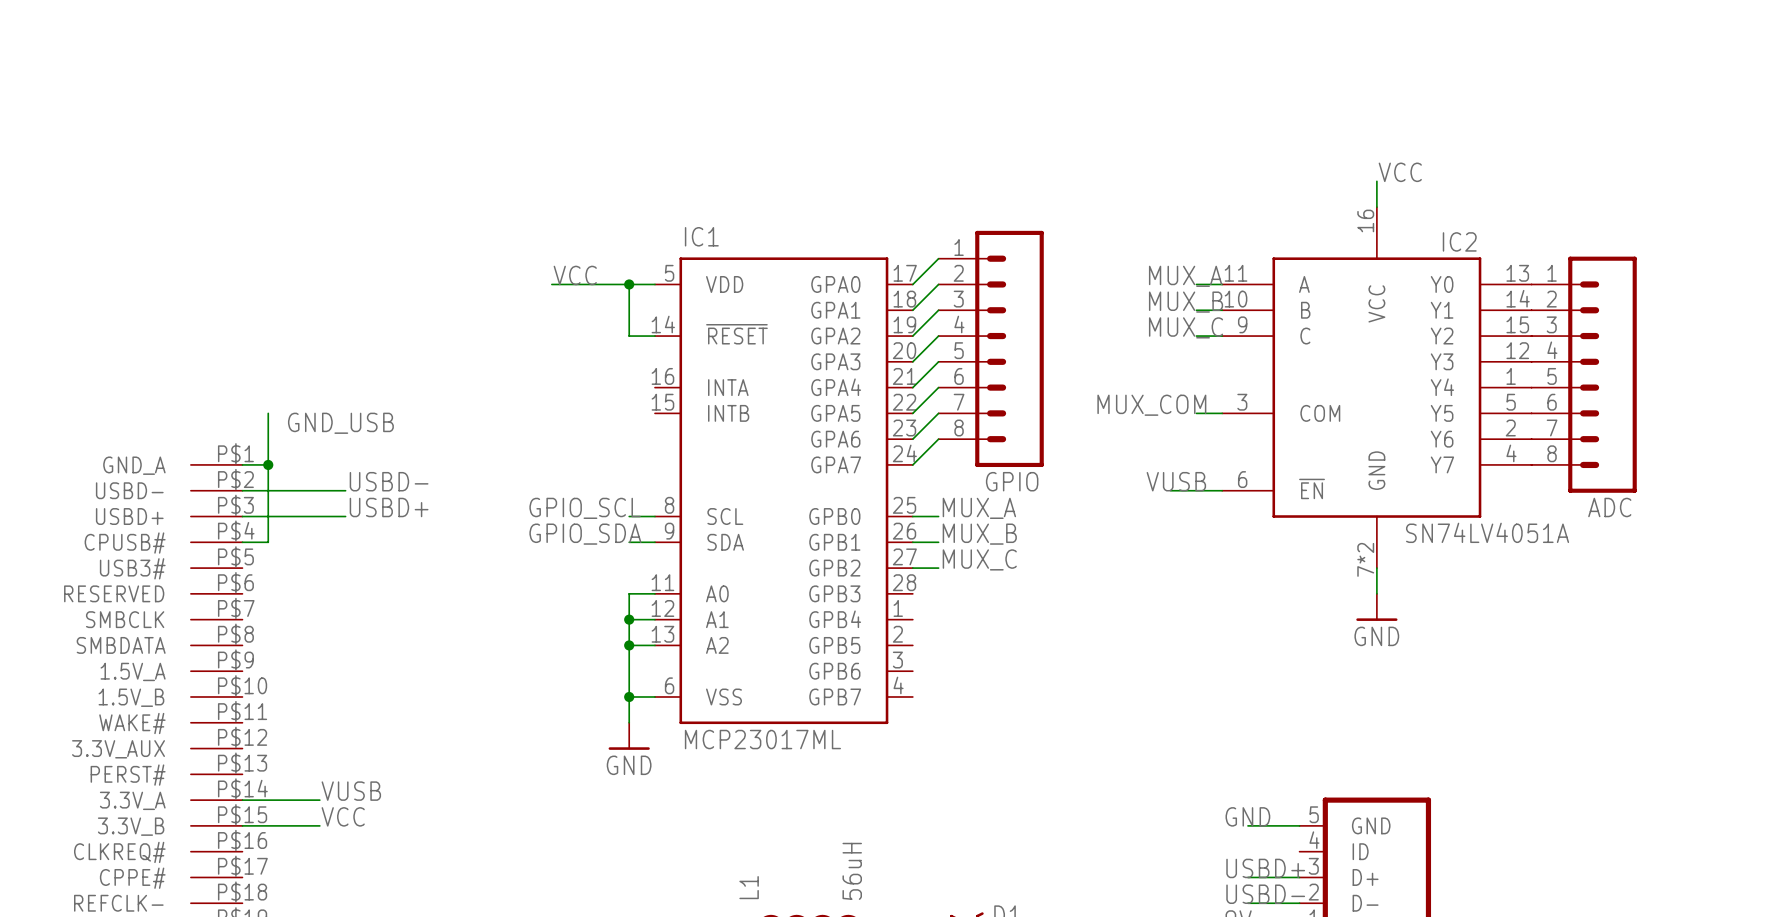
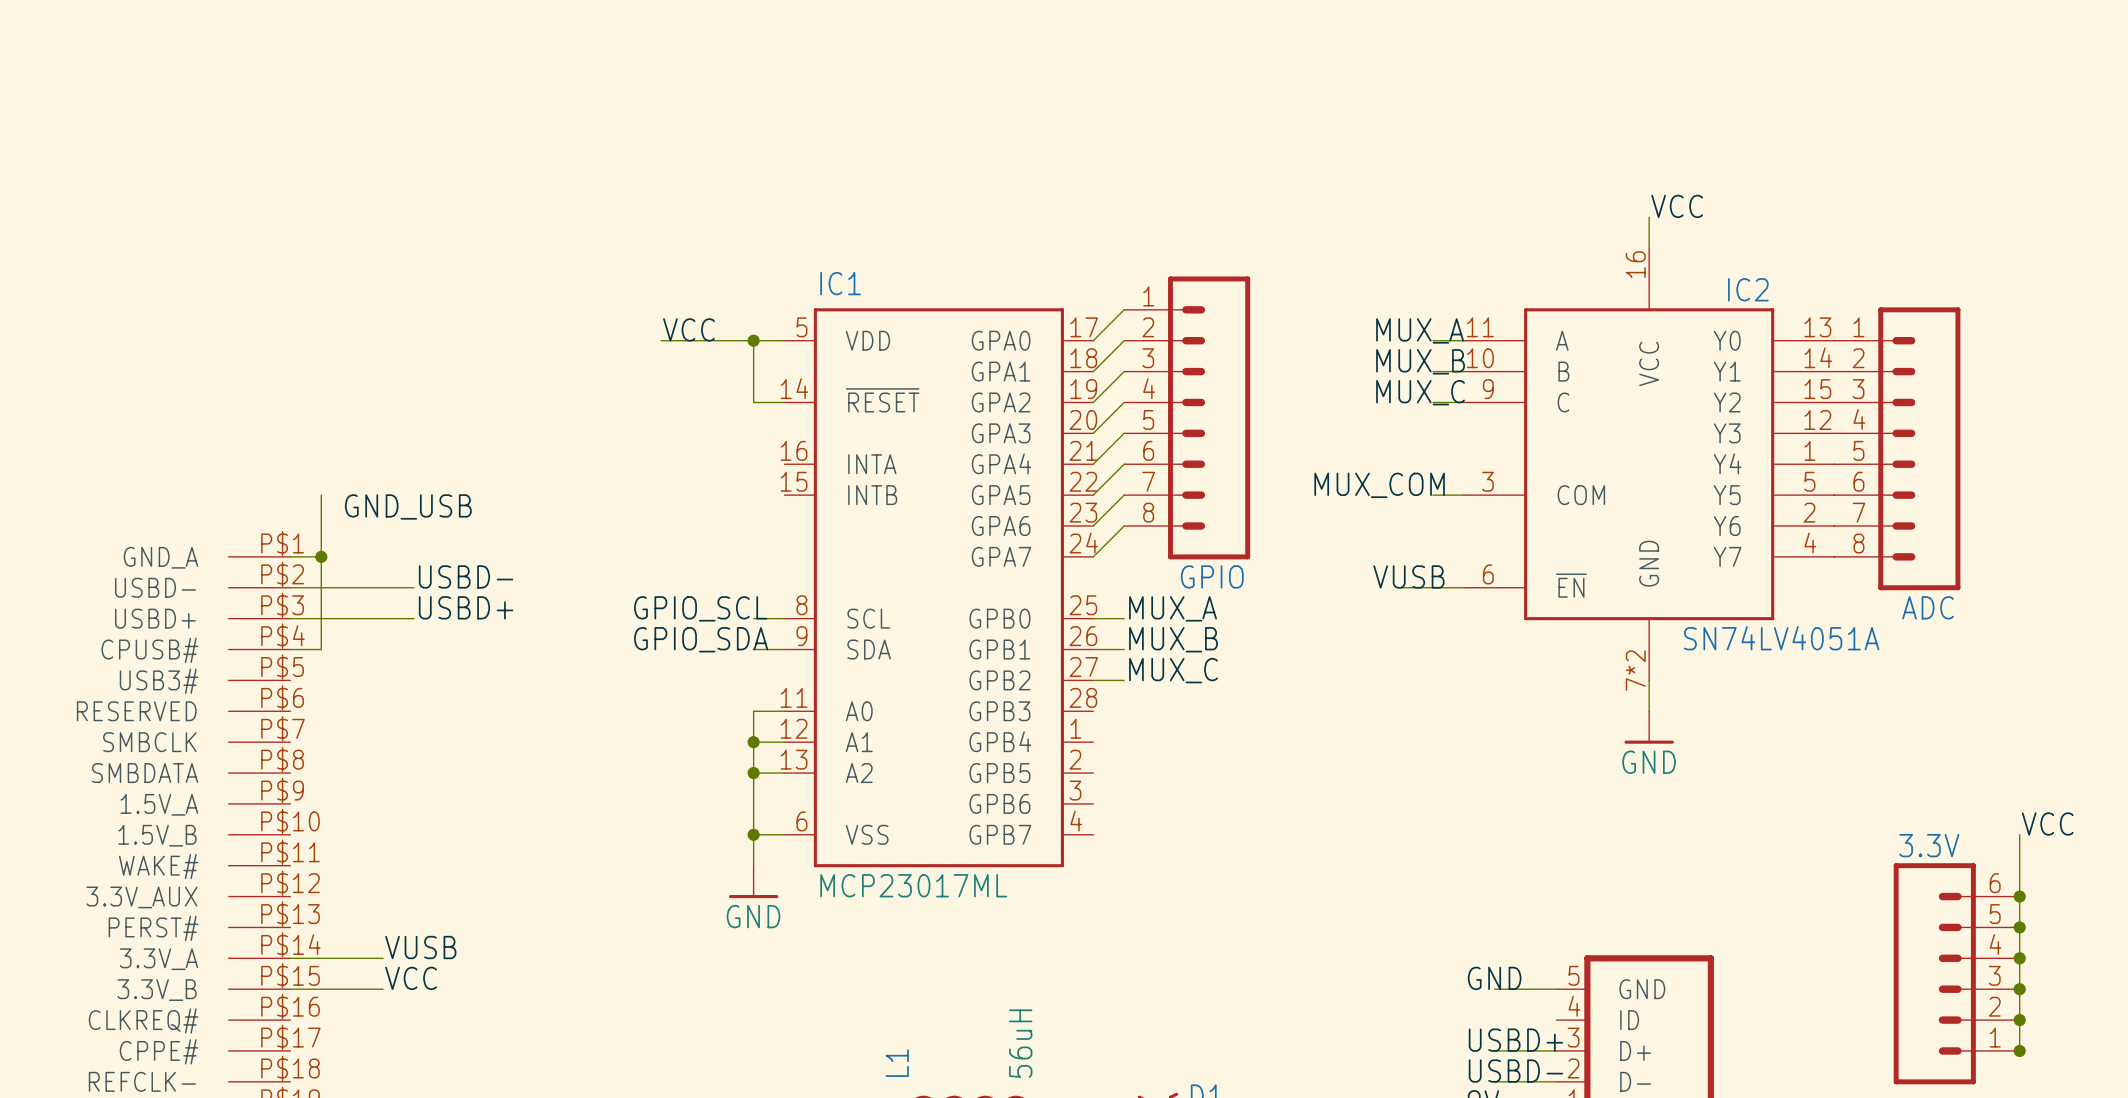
label: none -> VCC (2047, 823)
wire: none -> (2019, 834) (2019, 1050)
junction: none -> (2019, 896)
junction: none -> (2019, 927)
junction: none -> (2019, 958)
3.3V: none -> (1956, 973)
junction: none -> (2019, 989)
junction: none -> (2019, 1020)
junction: none -> (2019, 1050)

